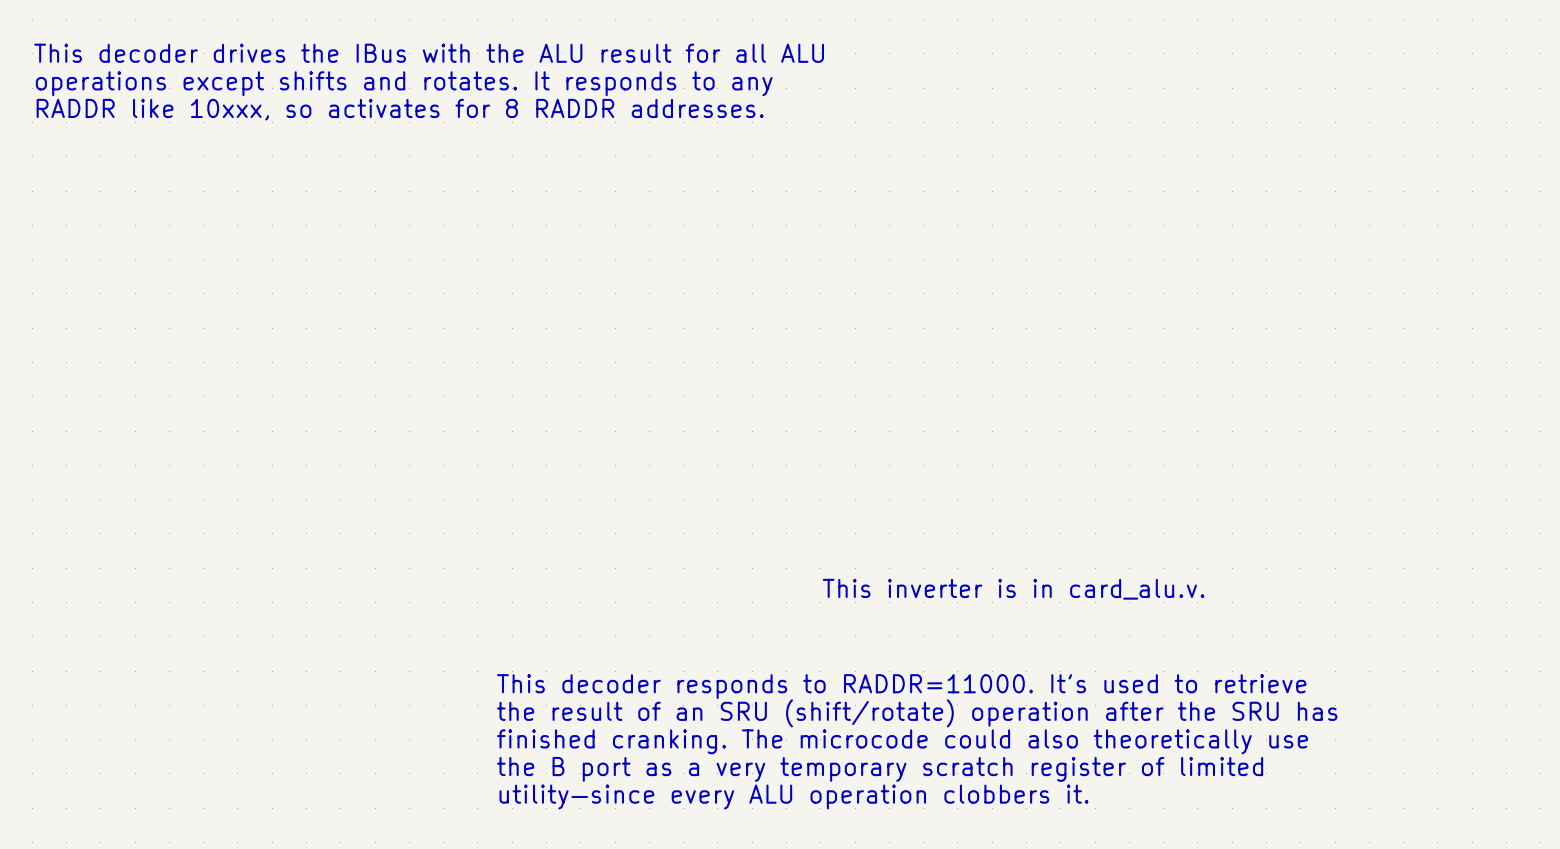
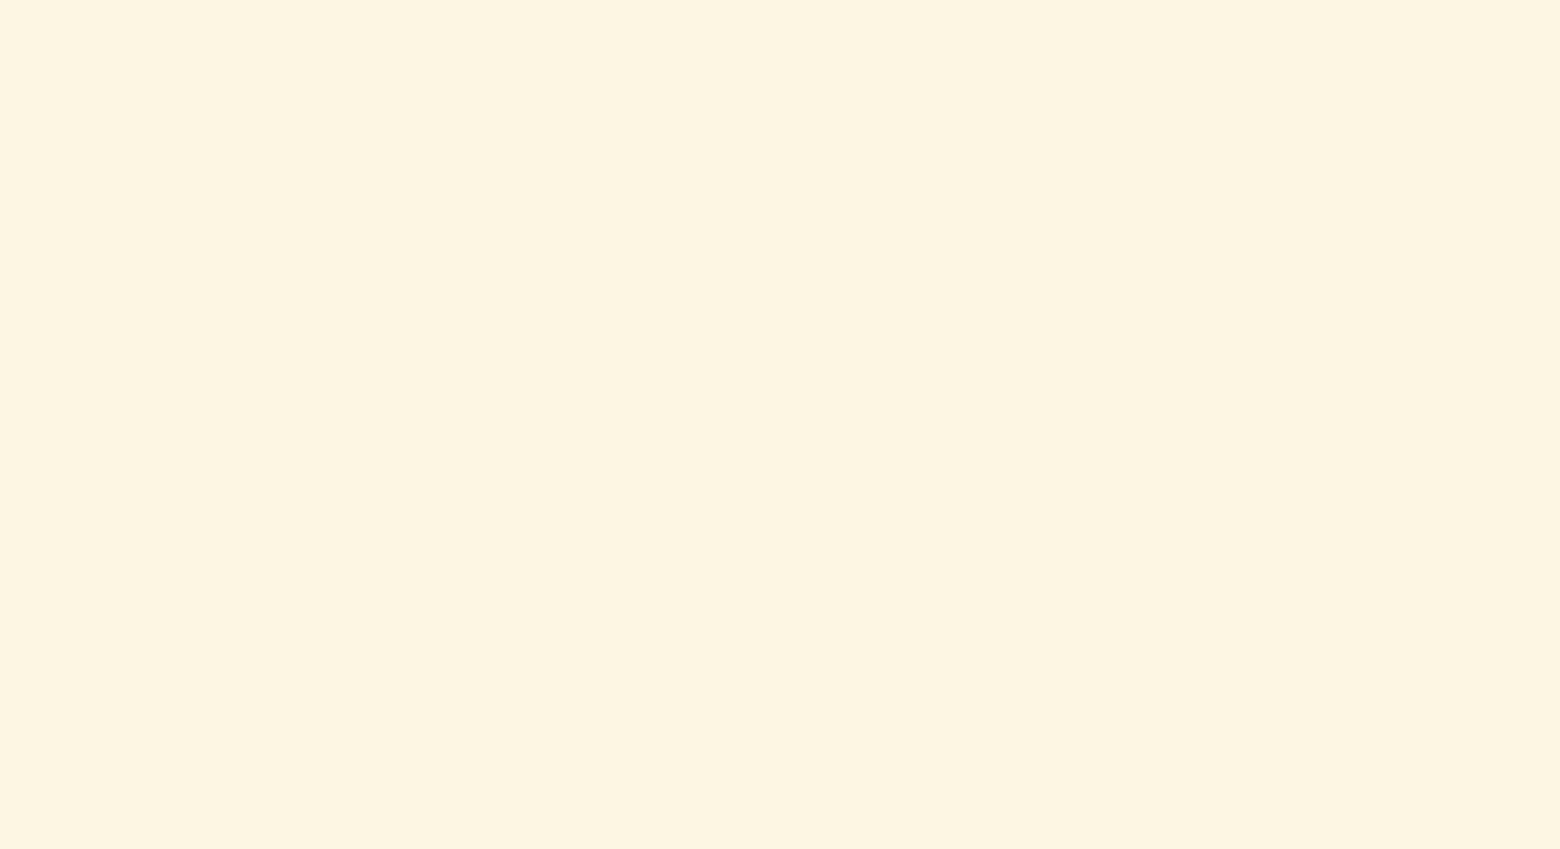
text: This decoder drives the IBus with the ALU result for all ALU (429, 53) -> none
text: operations except shifts and rotates. It responds to any (404, 83) -> none
text: RADDR like 10xxx, so activates for 8 RADDR addresses. (400, 109) -> none
text: This inverter is in card_alu.v. (1013, 589) -> none
text: This decoder responds to RADDR=11000. It's used to retrieve (901, 686) -> none
text: the result of an SRU (shift/rotate) operation after the SRU has (917, 713) -> none
text: finished cranking. The microcode could also theoretically use (902, 741) -> none
text: the B port as a very temporary scratch register of limited (880, 769) -> none
text: utility—since every ALU operation clobbers it. (793, 796) -> none

